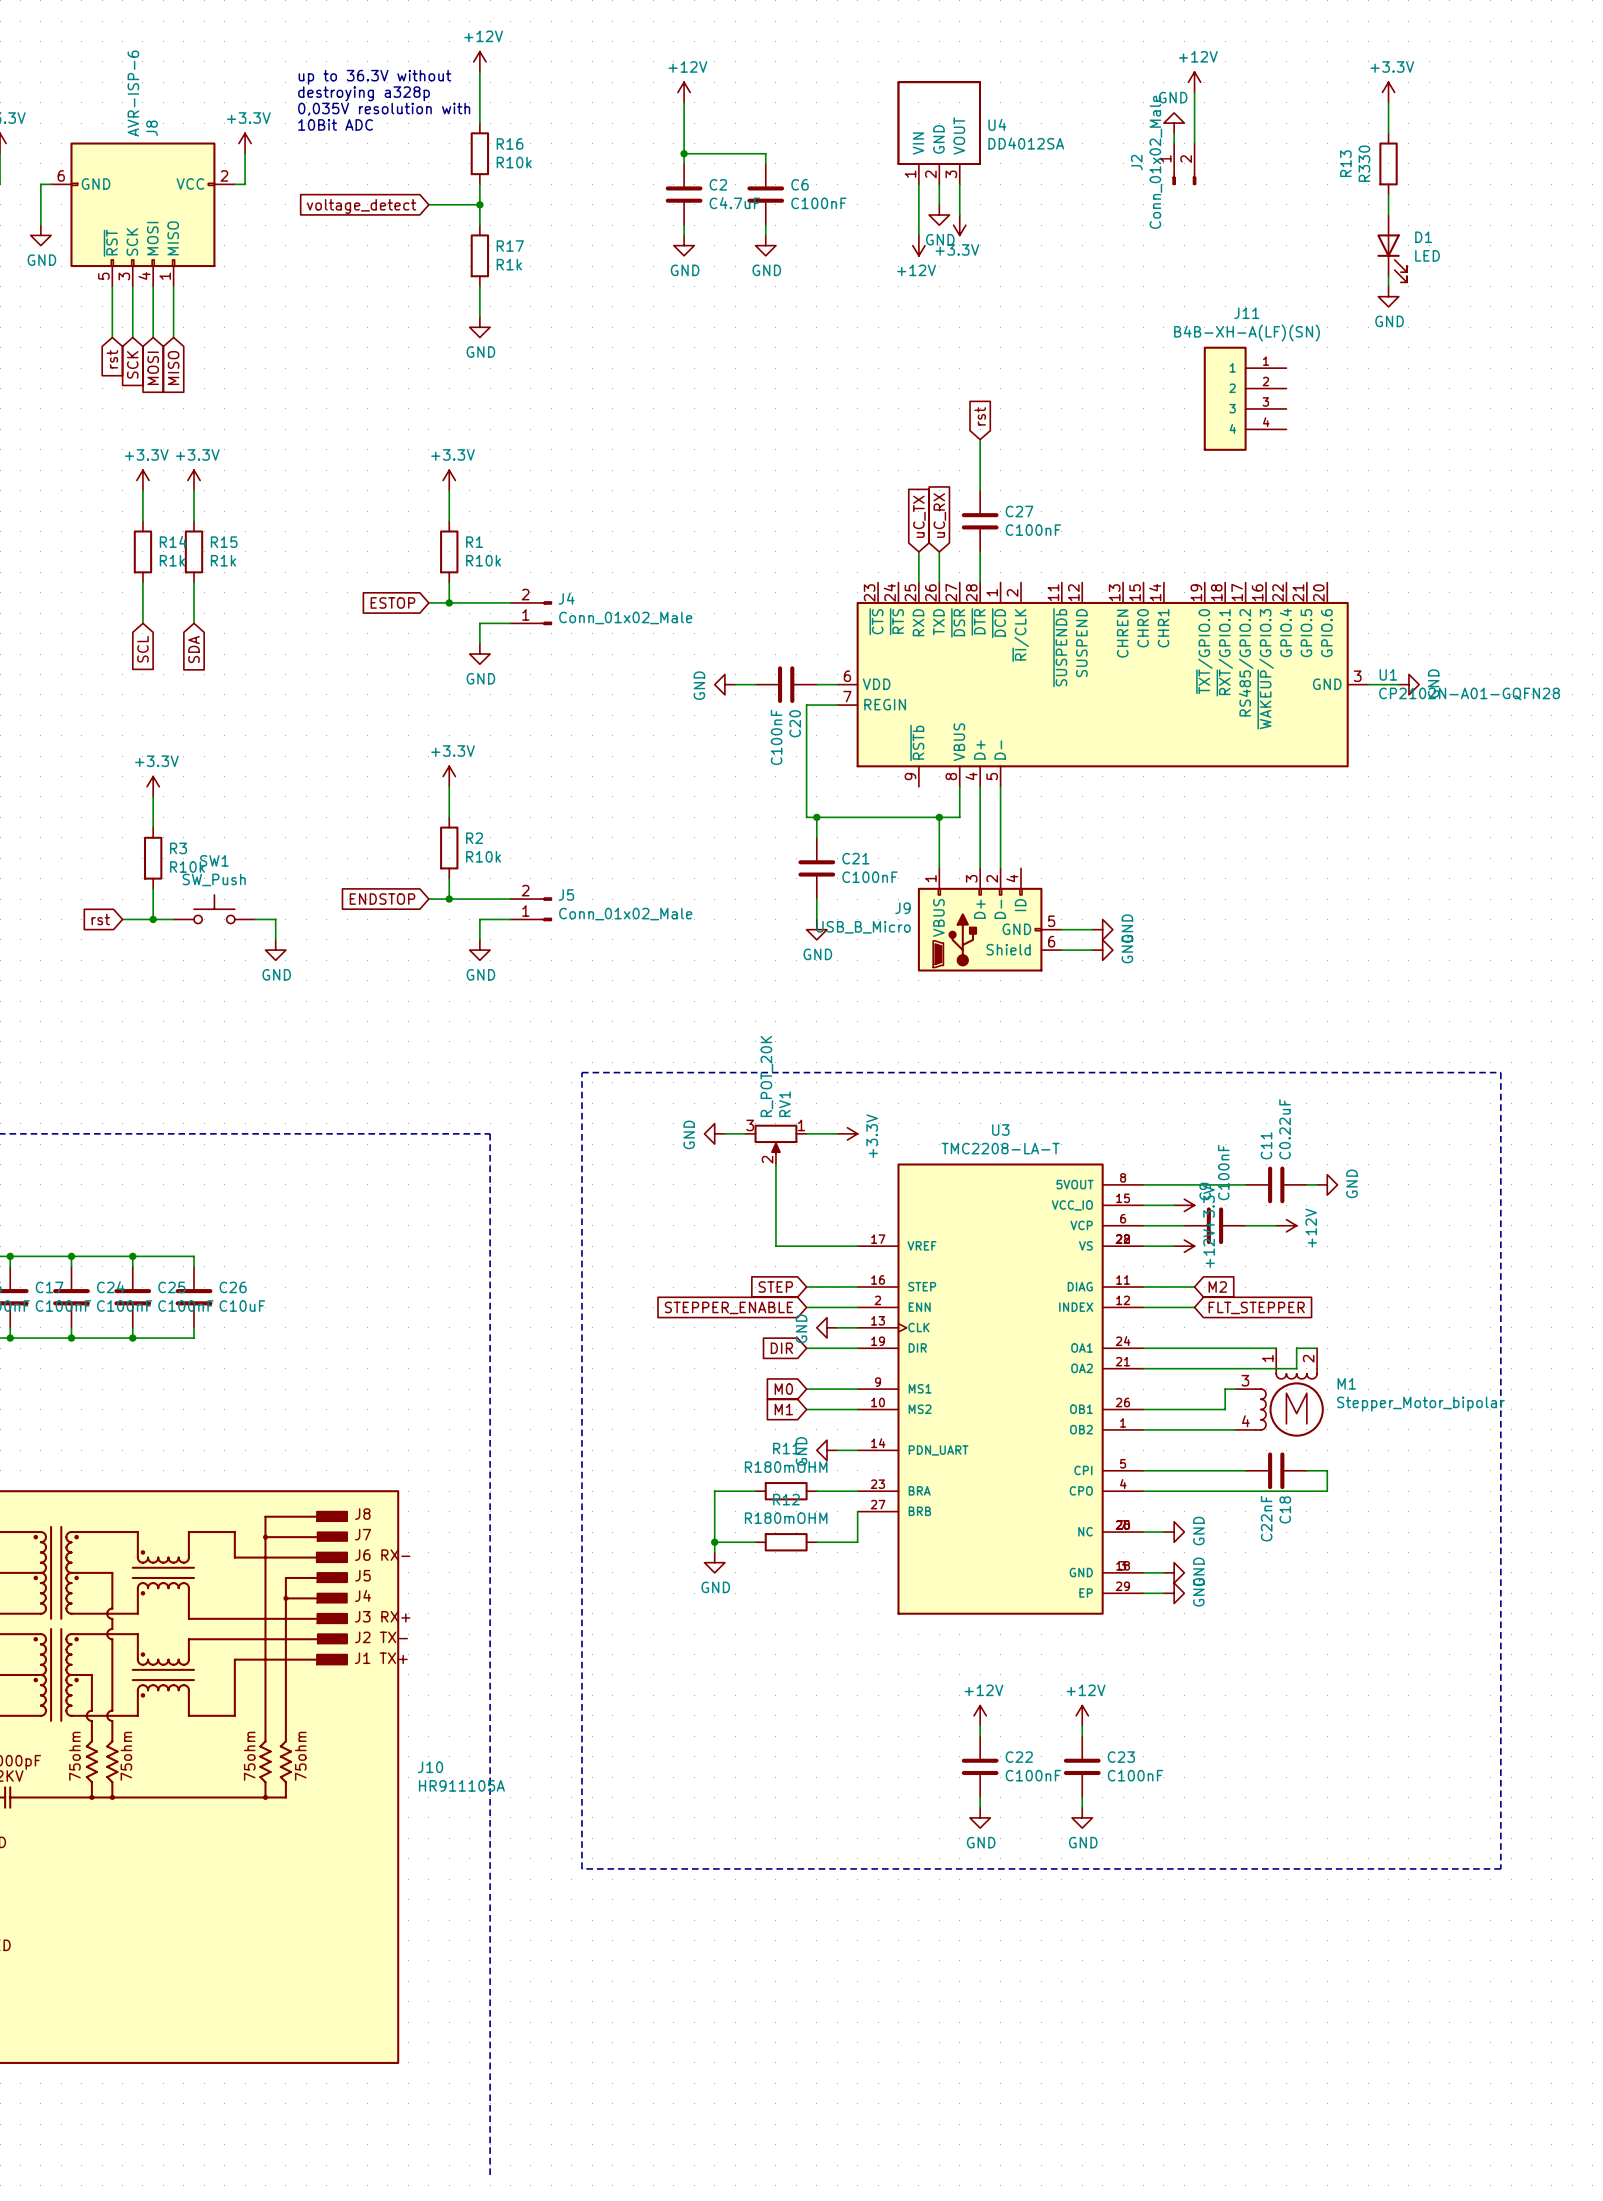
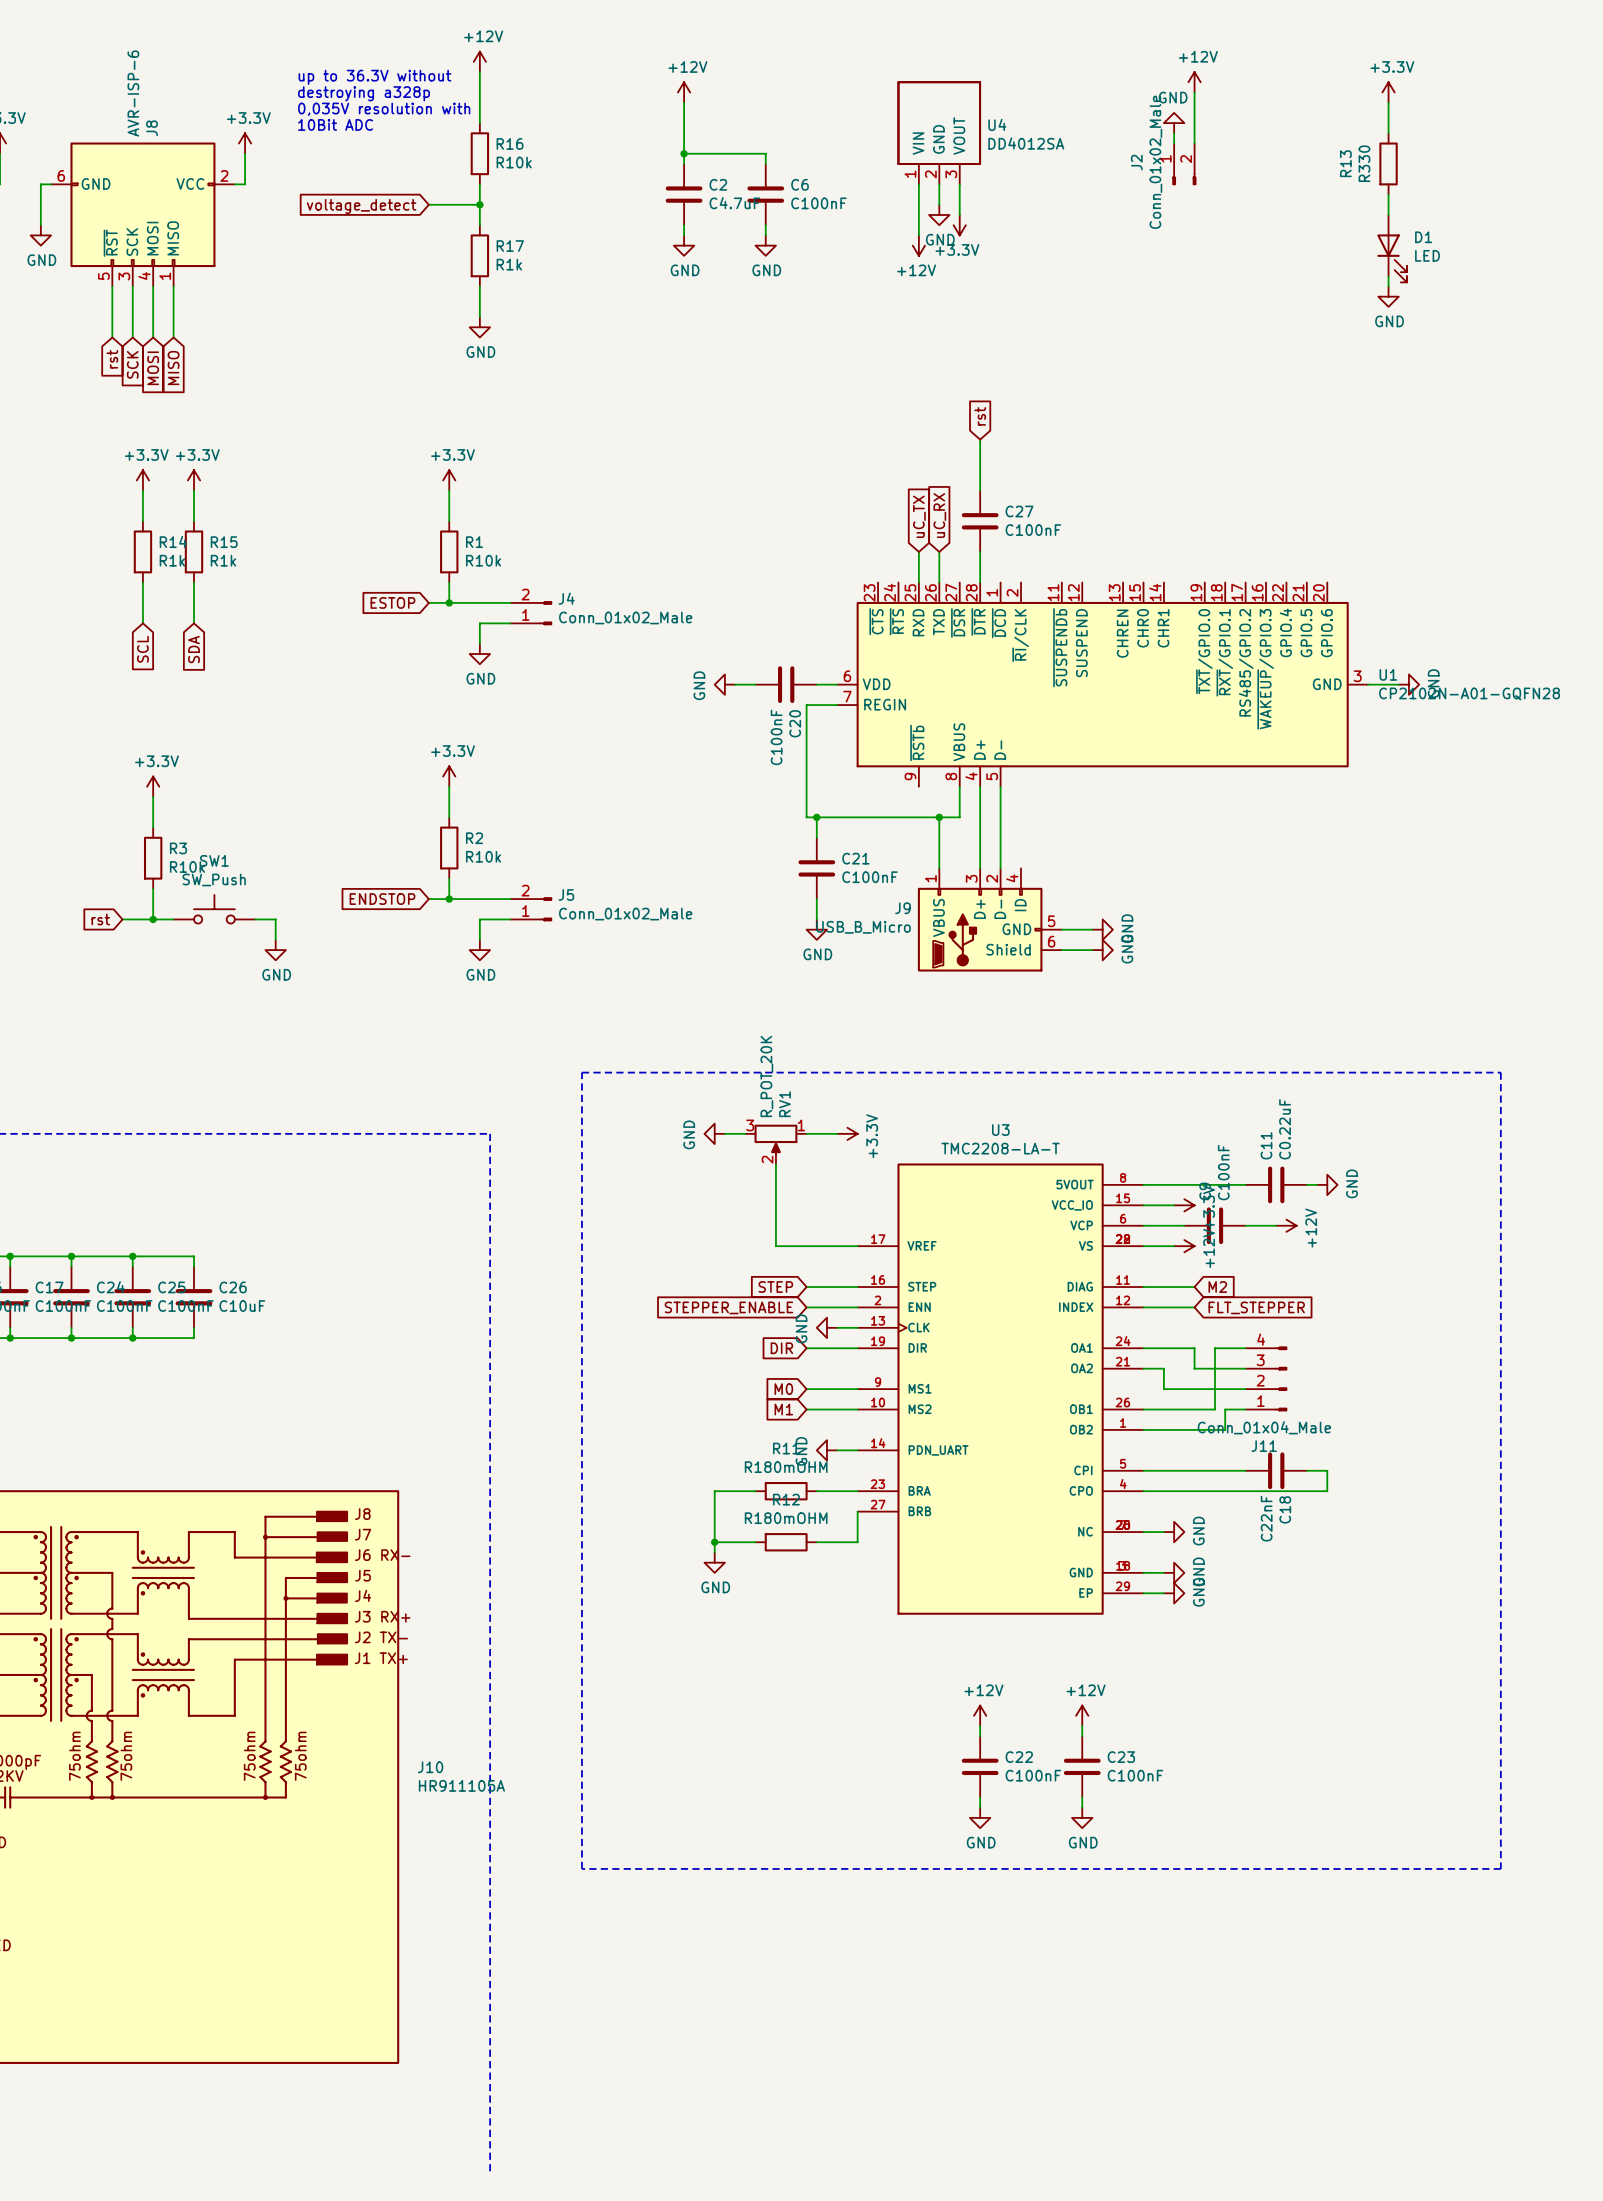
J11 name position: J11 (1246, 313) -> J11 (1264, 1446)
J11 value: B4B-XH-A(LF)(SN) (1247, 333) -> Conn_01x04_Male (1264, 1427)
J11 symbol: [1203, 346, 1287, 451] -> [1245, 1346, 1288, 1412]
wire: (1194, 1348) (1214, 1348) -> (1194, 1348) (1194, 1368)
wire: (1317, 1348) (1296, 1348) (1296, 1368) (1245, 1368) -> none
wire: (1163, 1368) (1194, 1368) -> (1163, 1368) (1163, 1389) (1225, 1389)
wire: (1225, 1389) (1225, 1409) (1214, 1409) -> (1214, 1348) (1214, 1409)
M1: Stepper_Motor_bipolar (1279, 1392) -> none
wire: (1225, 1429) (1235, 1429) -> (1225, 1429) (1225, 1409) (1245, 1409)

